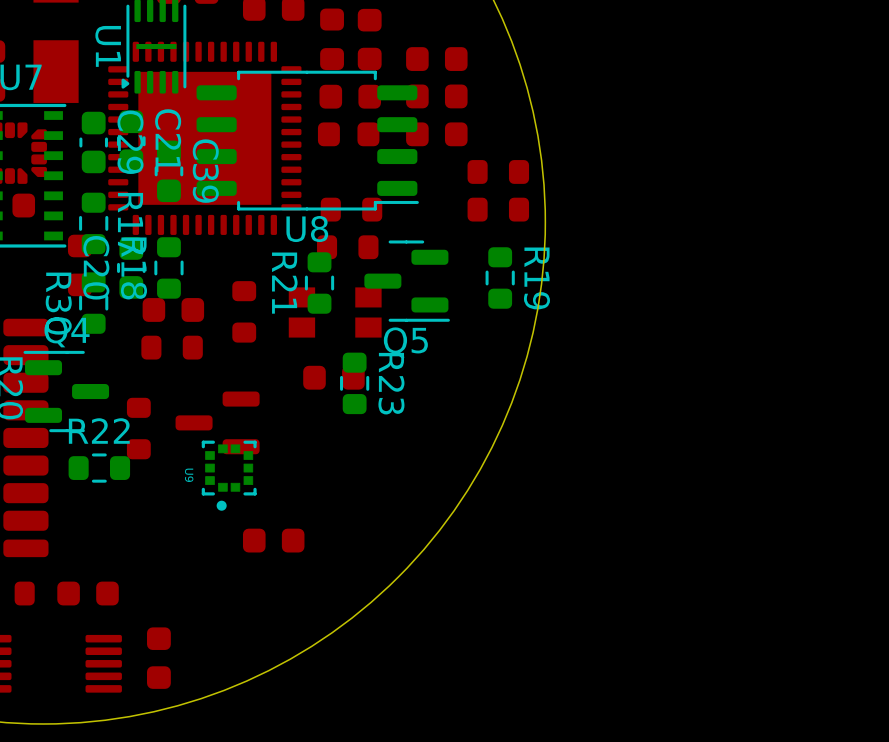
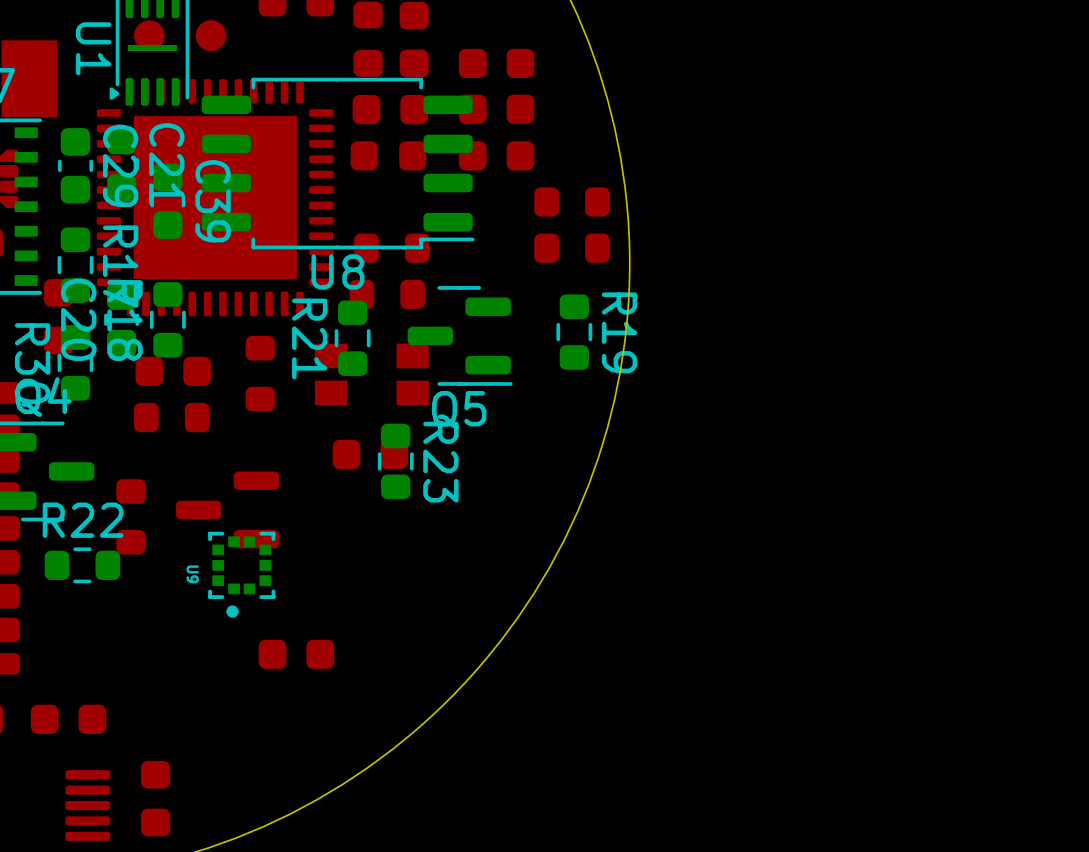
part: none -> (149, 35)
part: none -> (210, 35)
part position: (204, 138) -> (215, 197)

